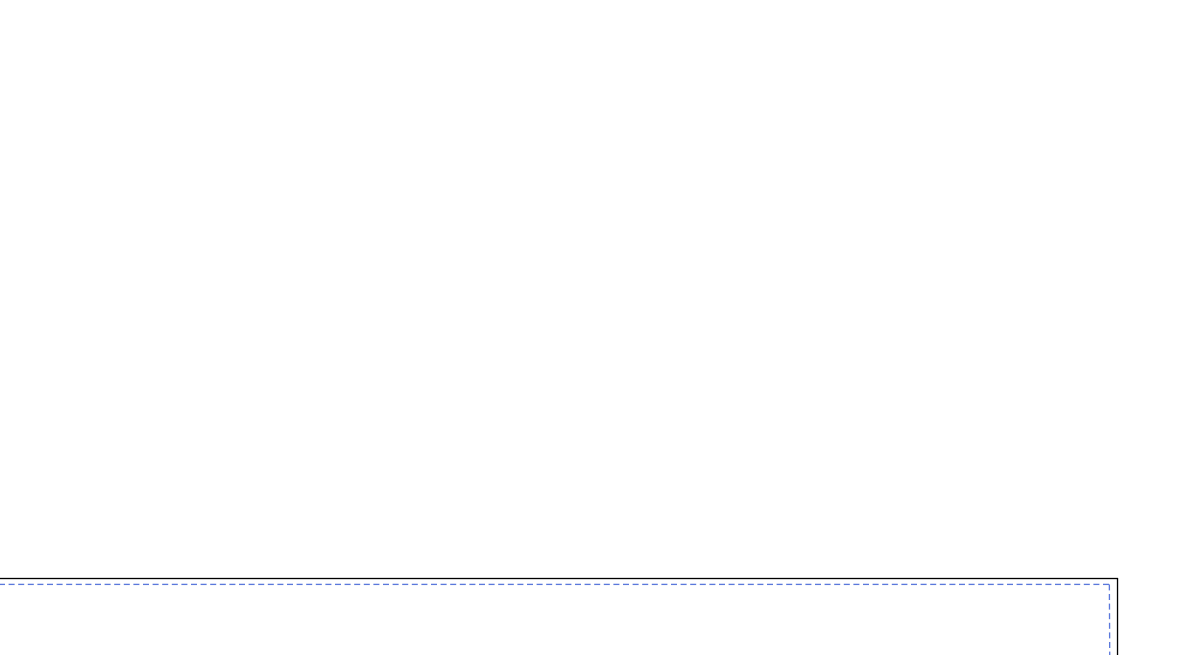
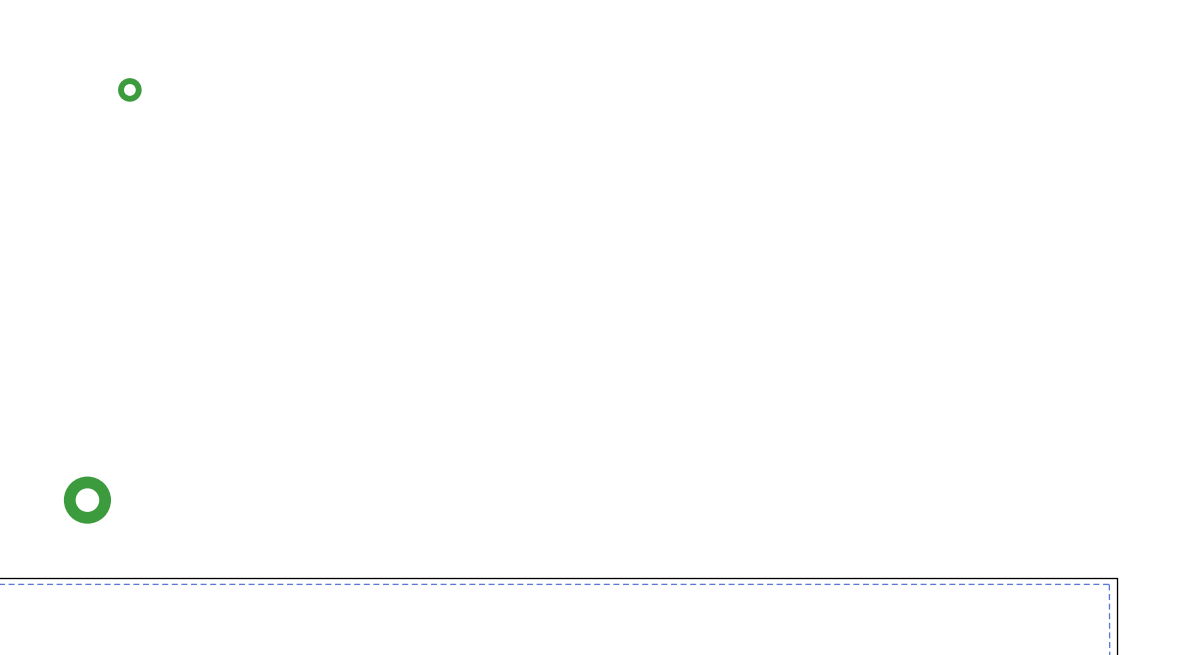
via: none -> (129, 89)
via: none -> (87, 500)

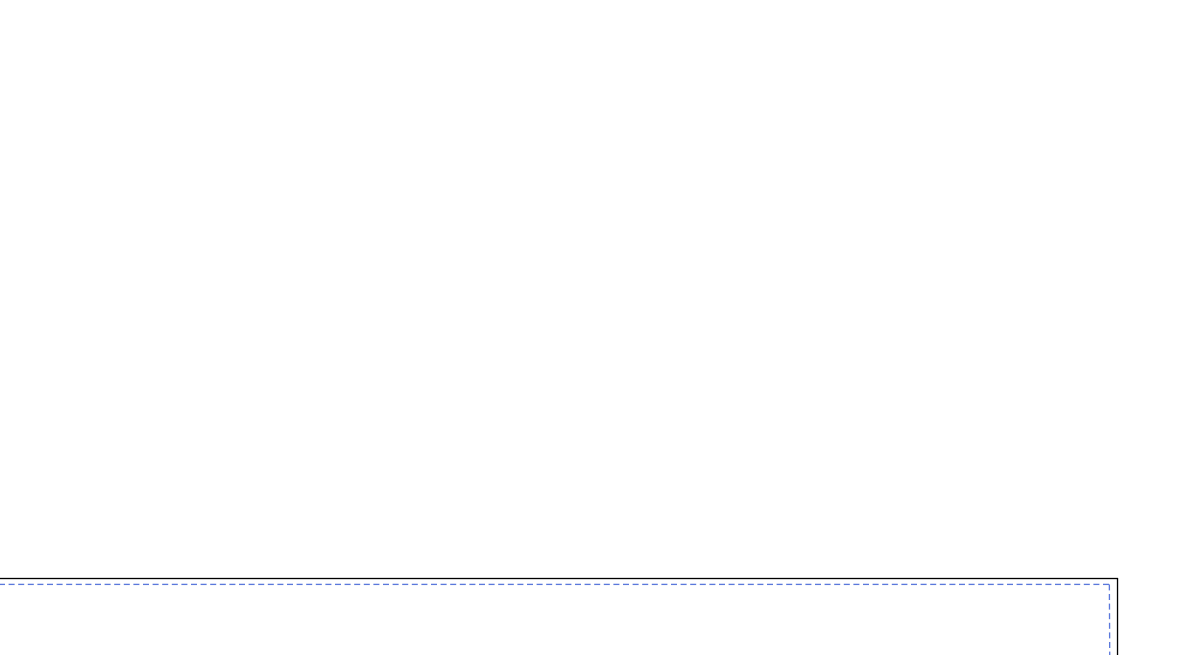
via: (129, 89) -> none
via: (87, 500) -> none

